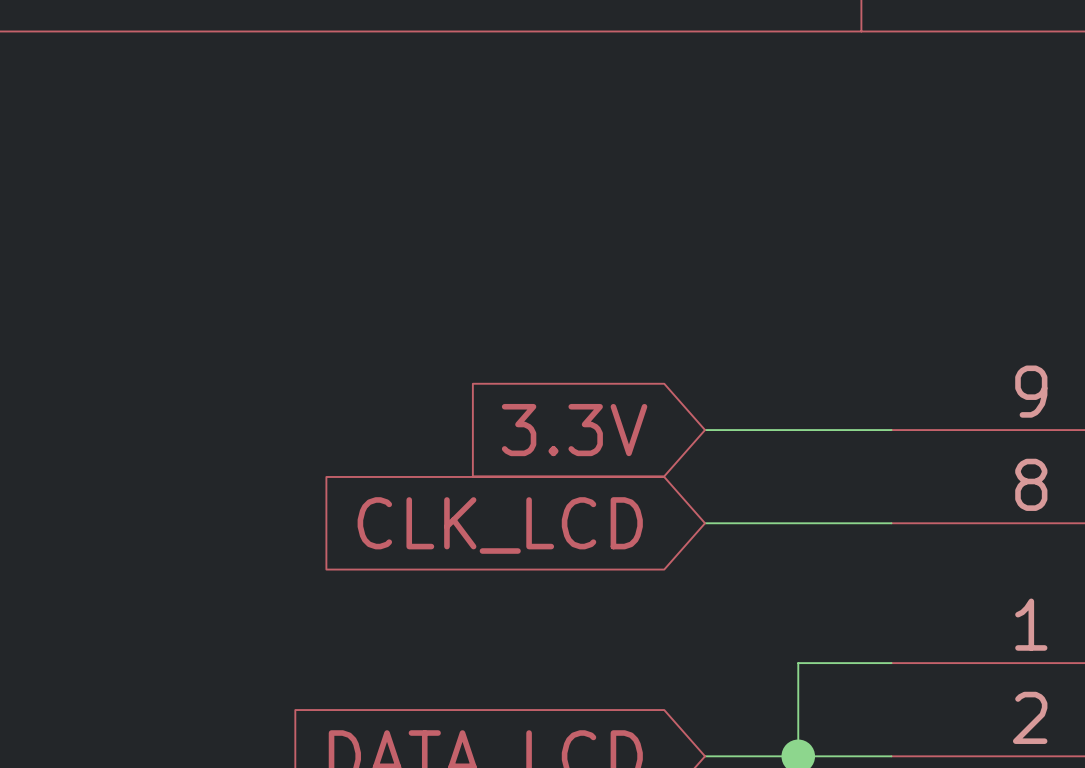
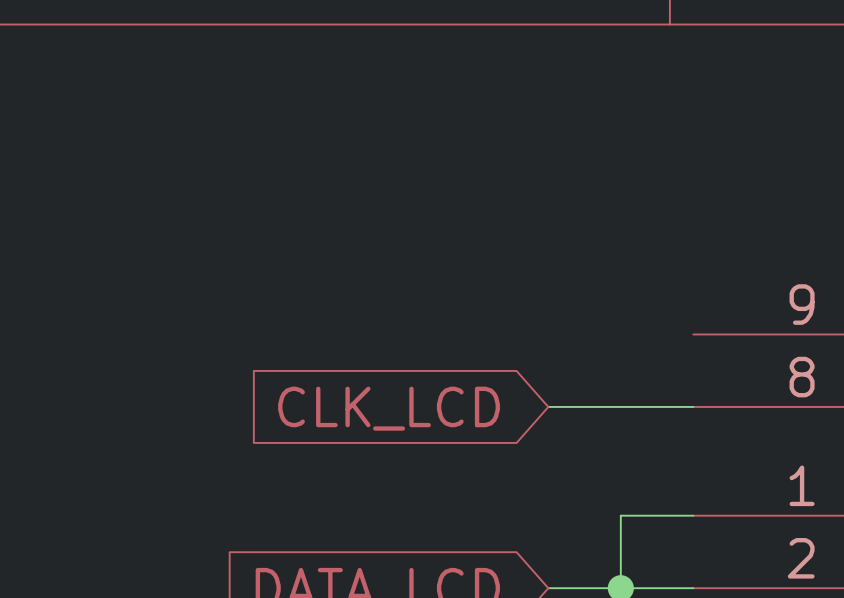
global label: 3.3V (574, 430) -> none
wire: (705, 430) (891, 430) -> none

